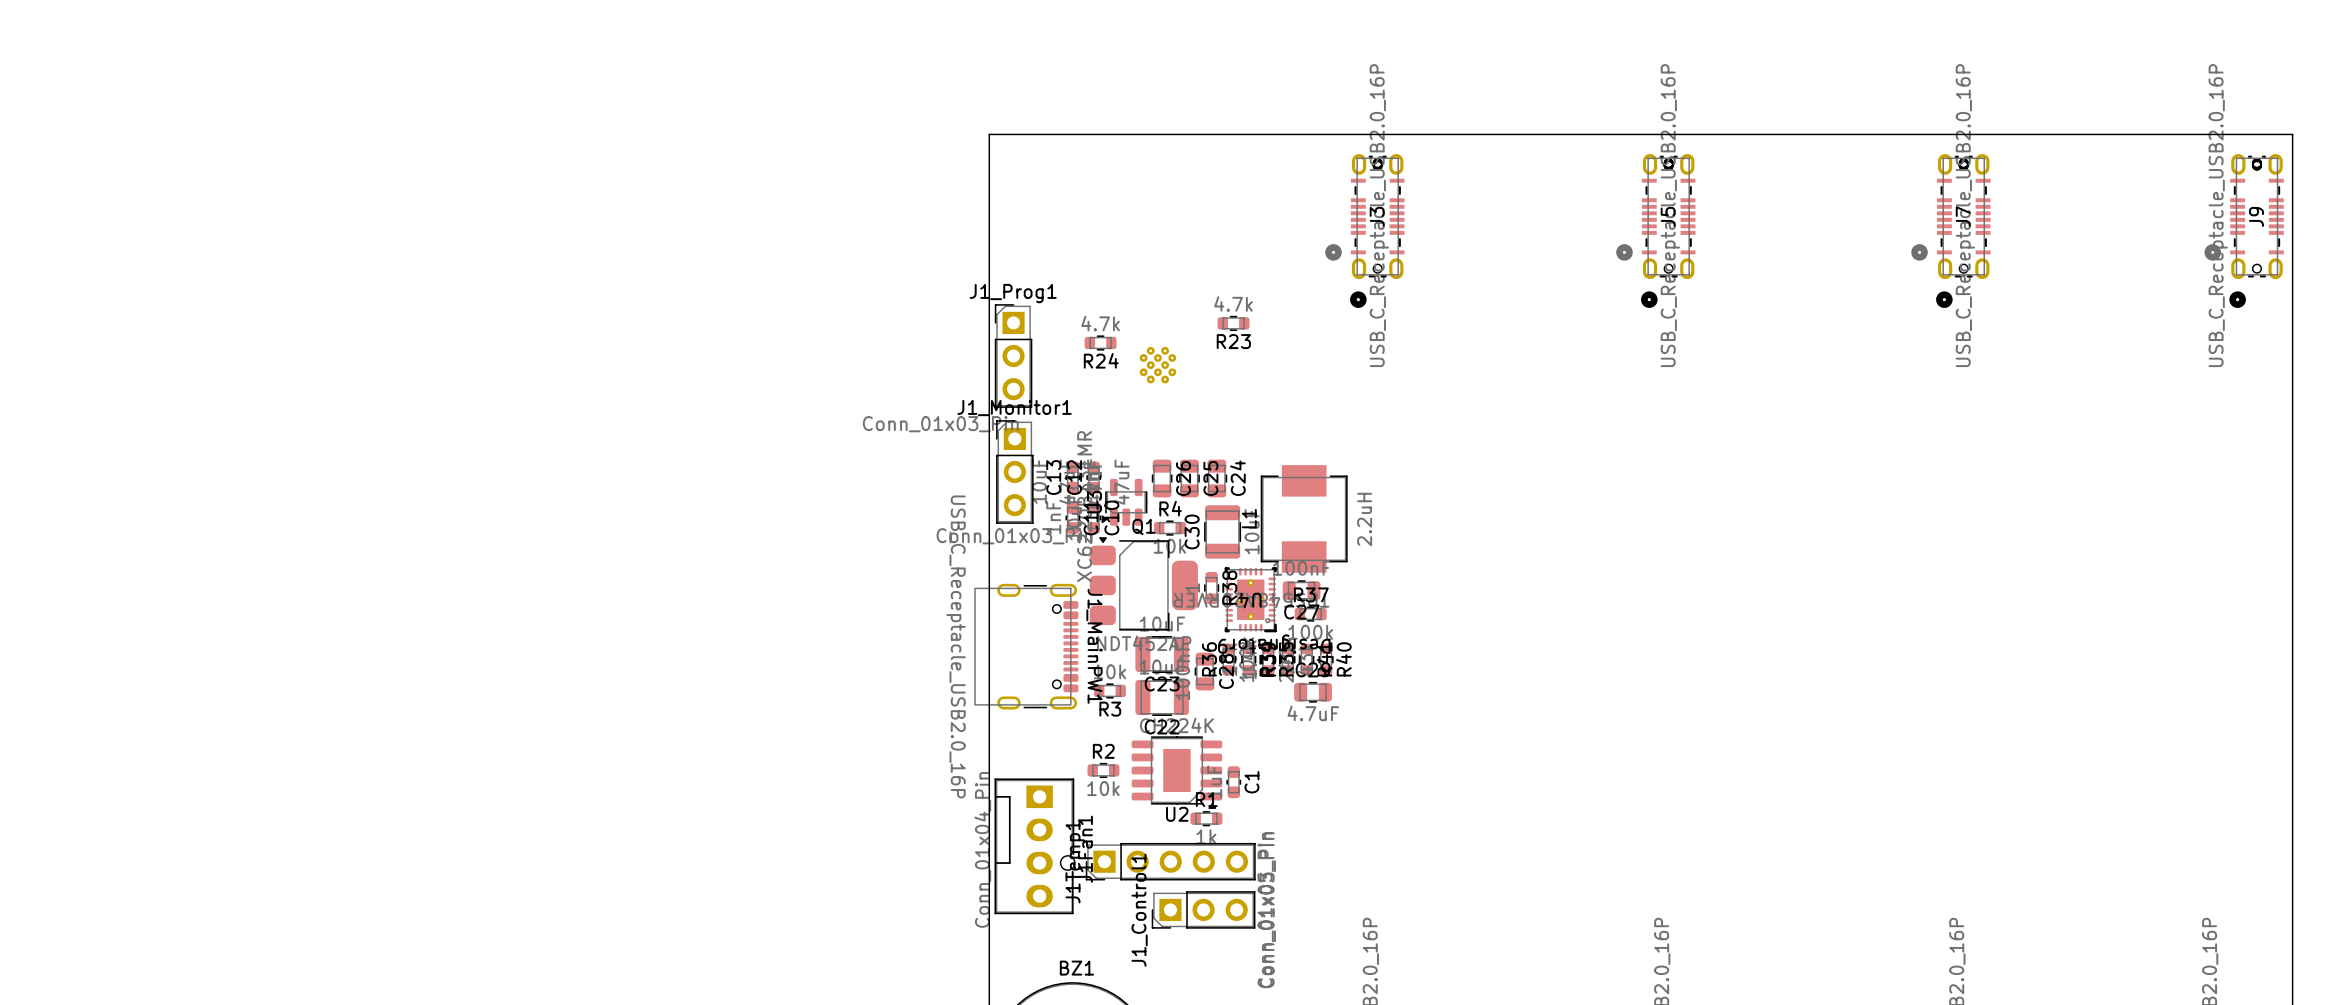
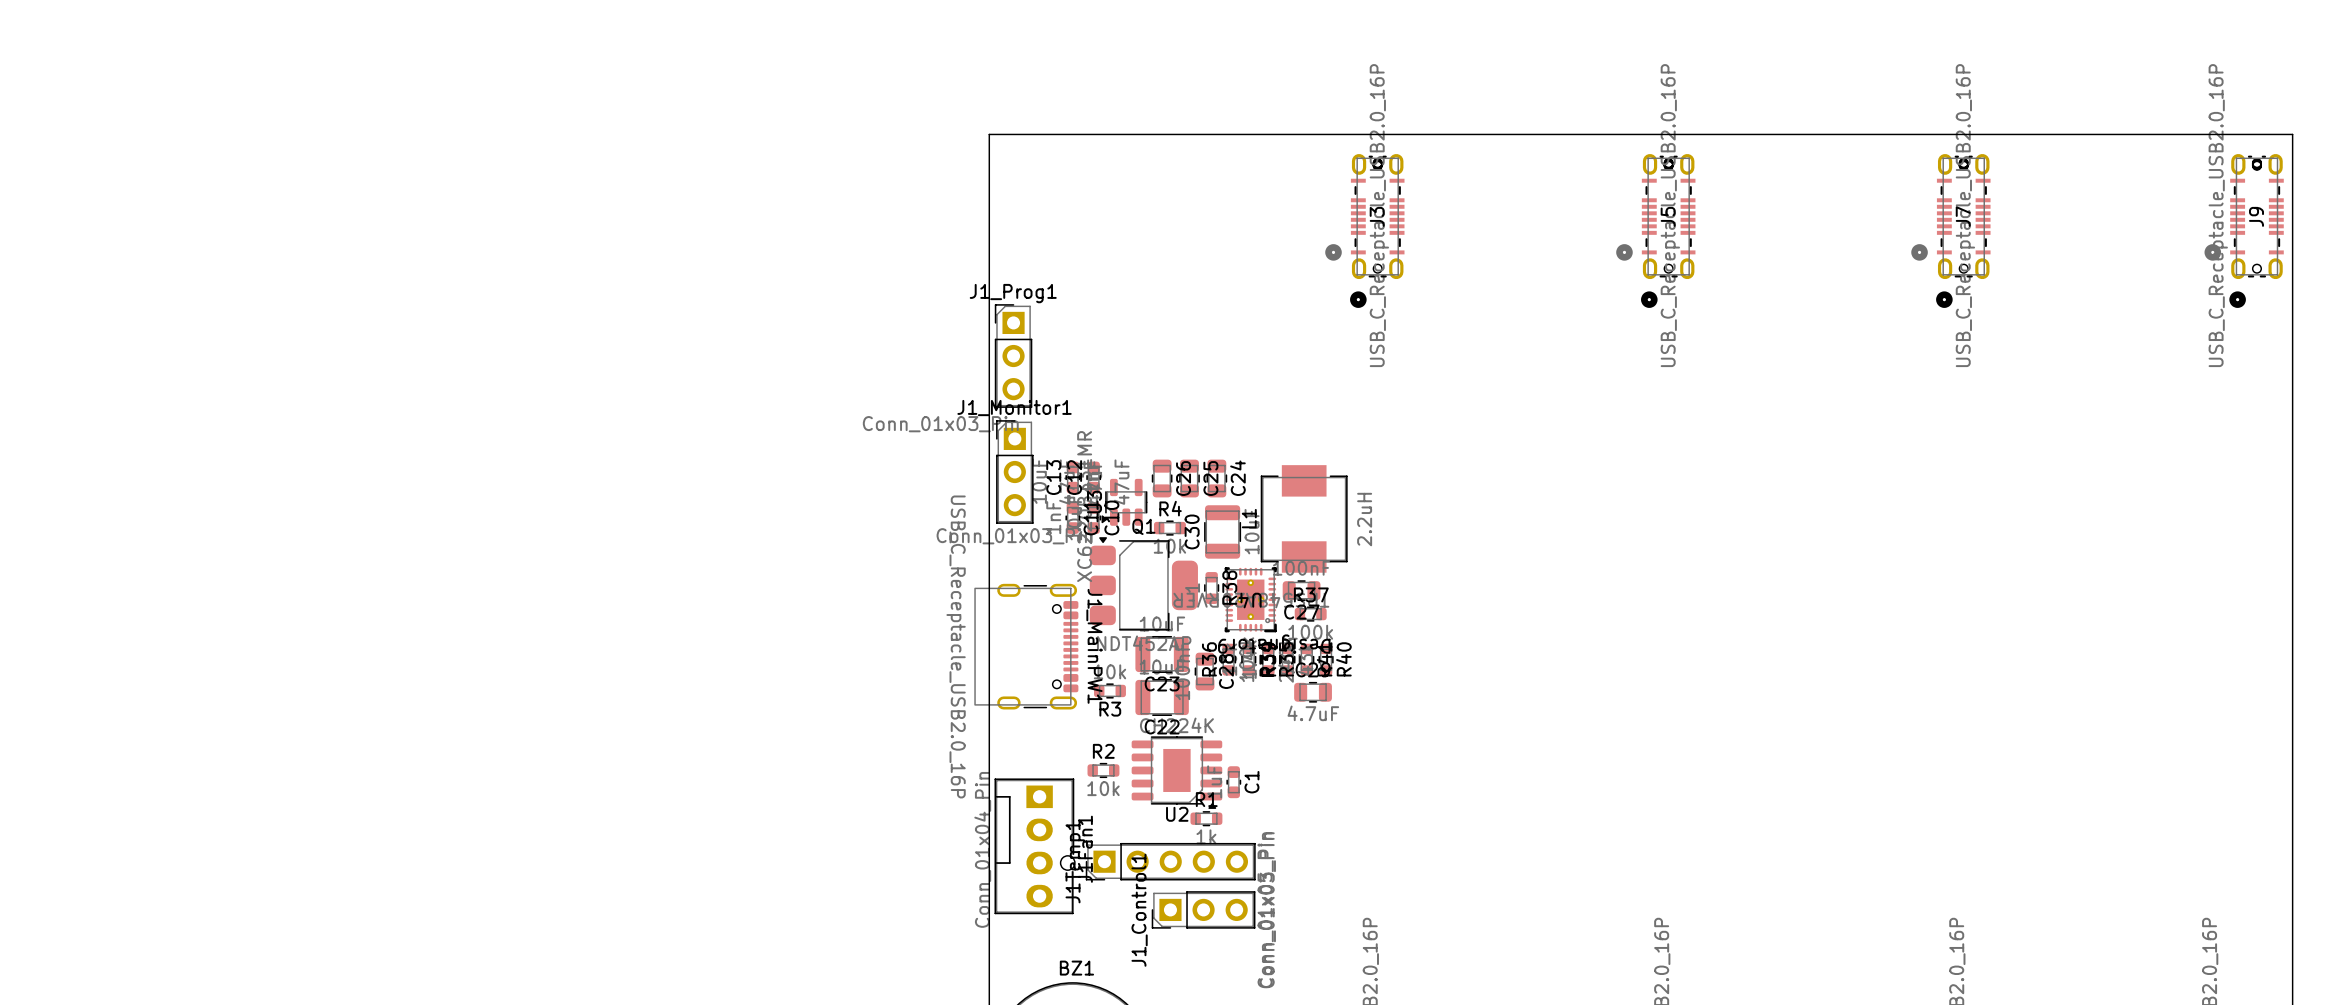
R23: 4.7k (1233, 323) -> none
R24: 4.7k (1100, 342) -> none
part: (1157, 365) -> none

